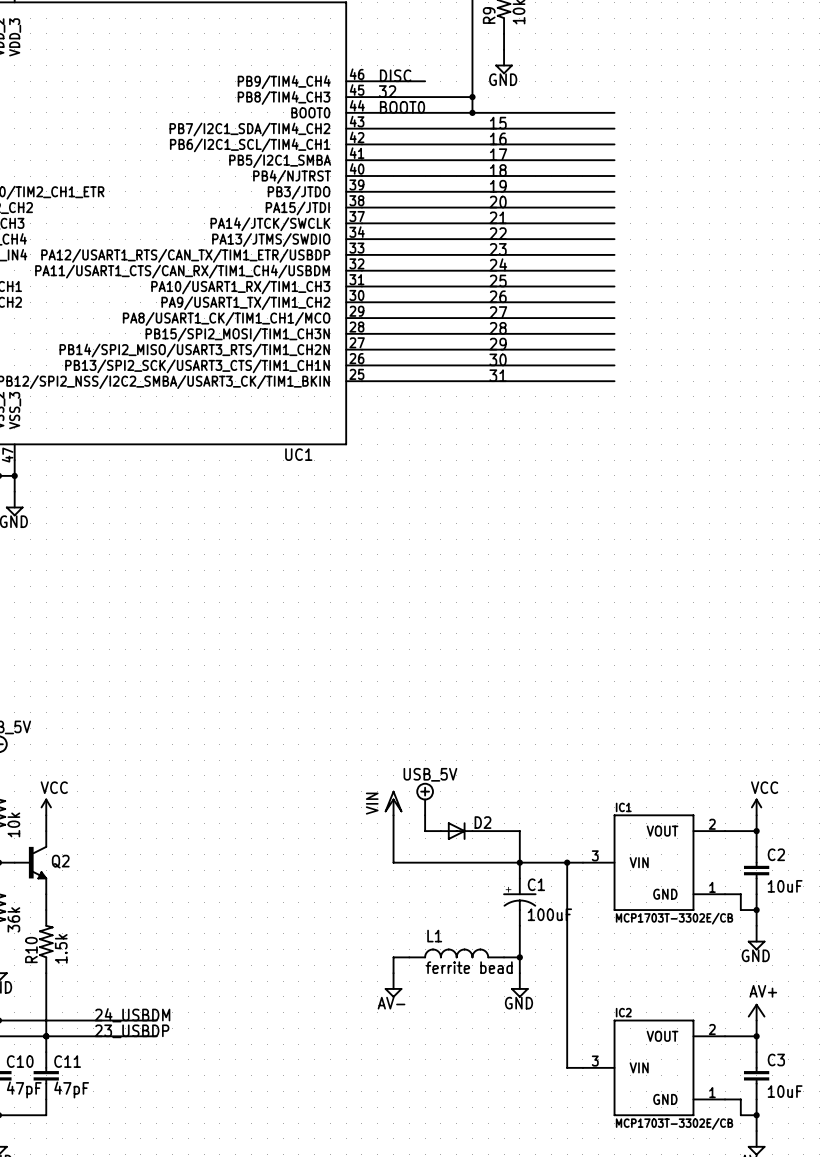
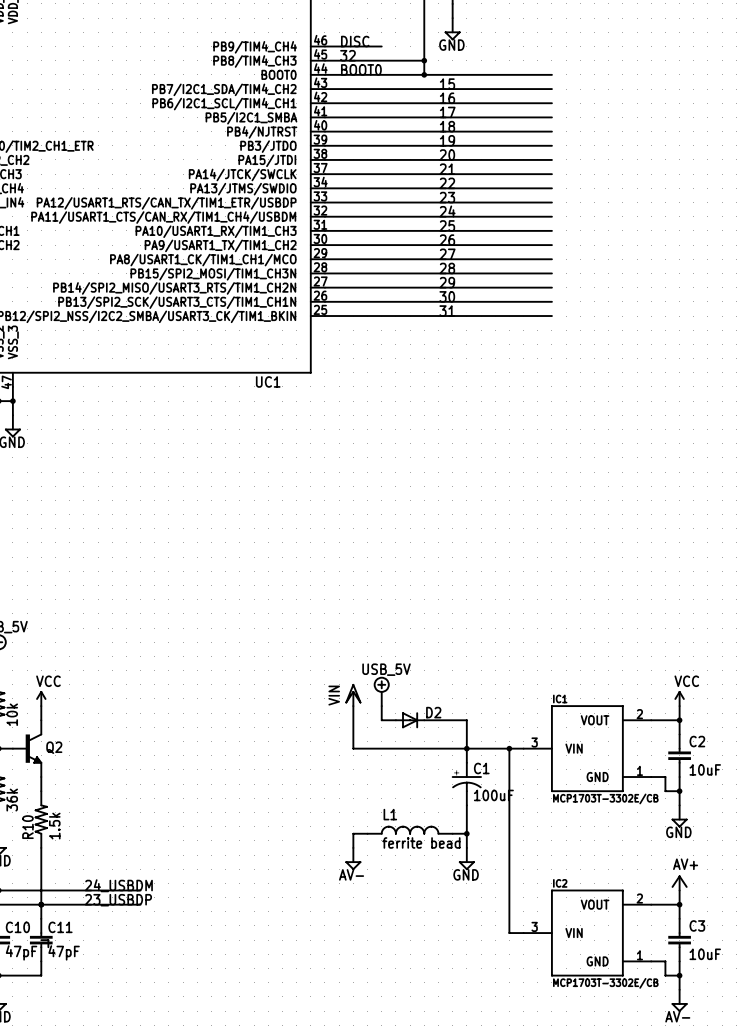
wire: none -> (41, 940) (48, 940) (48, 947)

